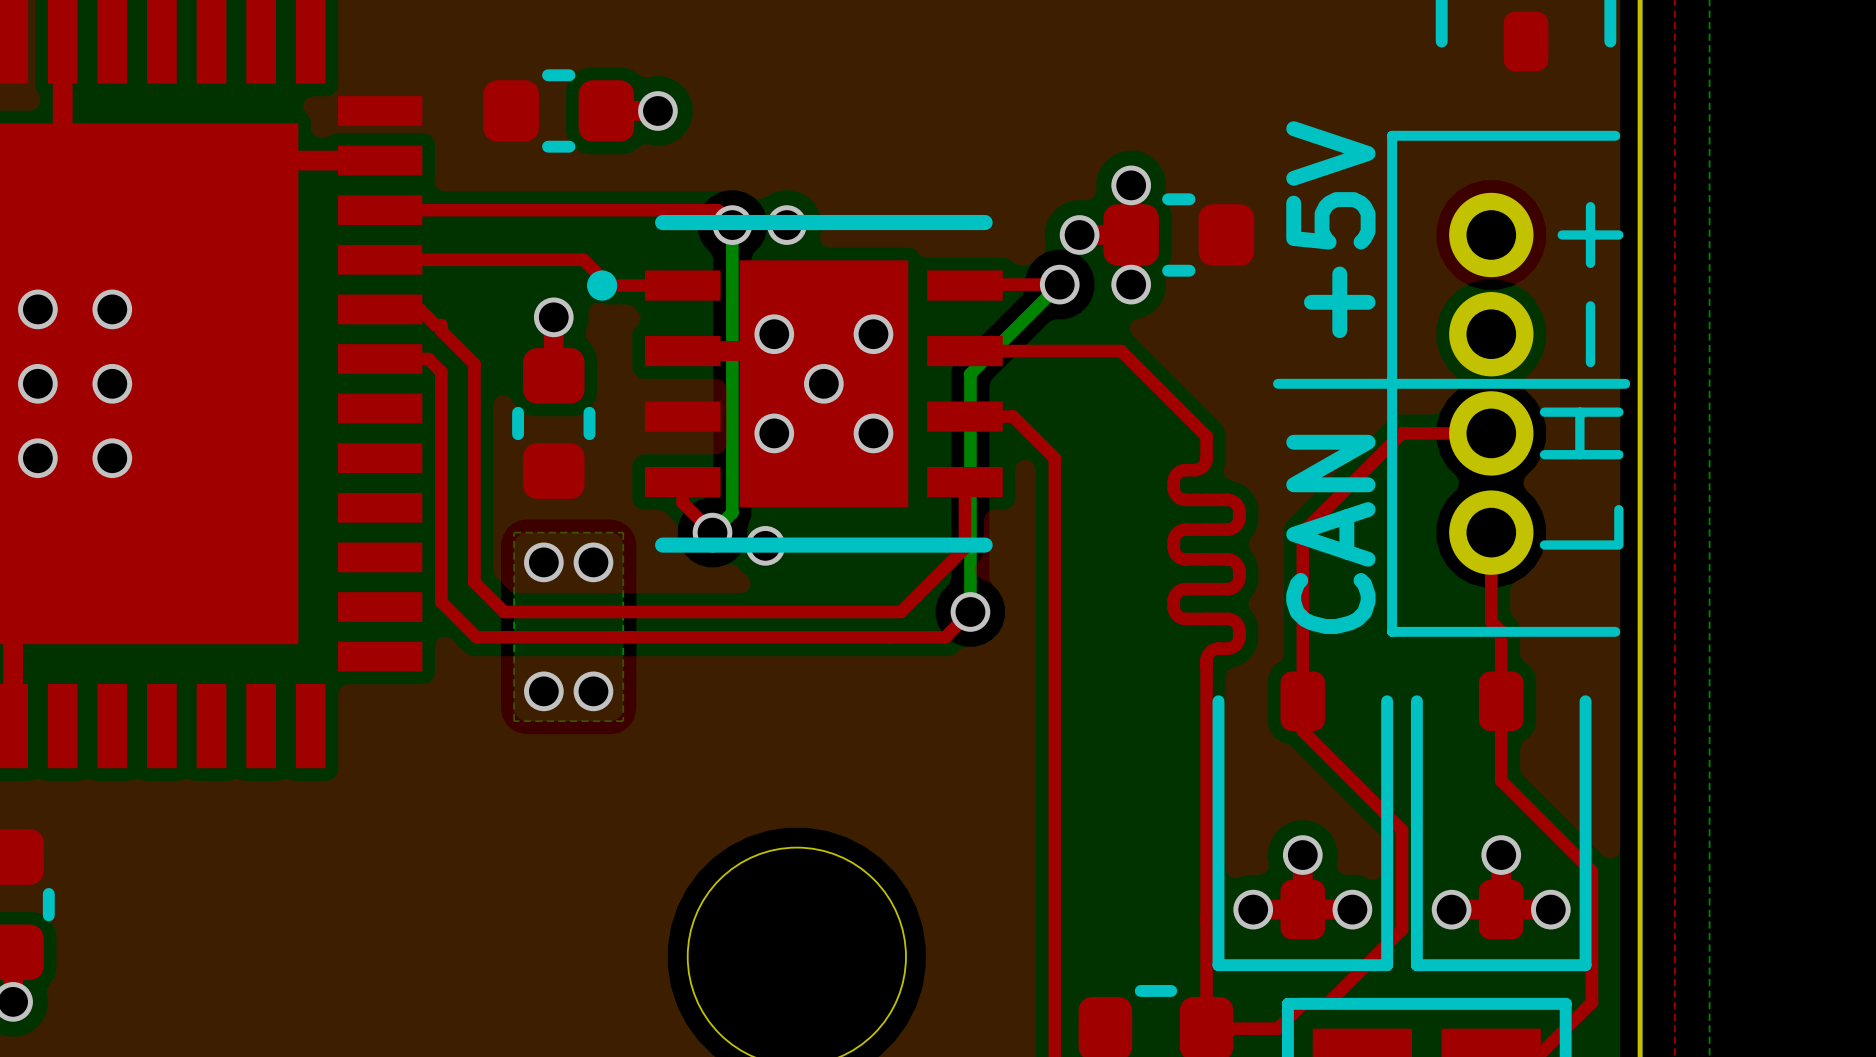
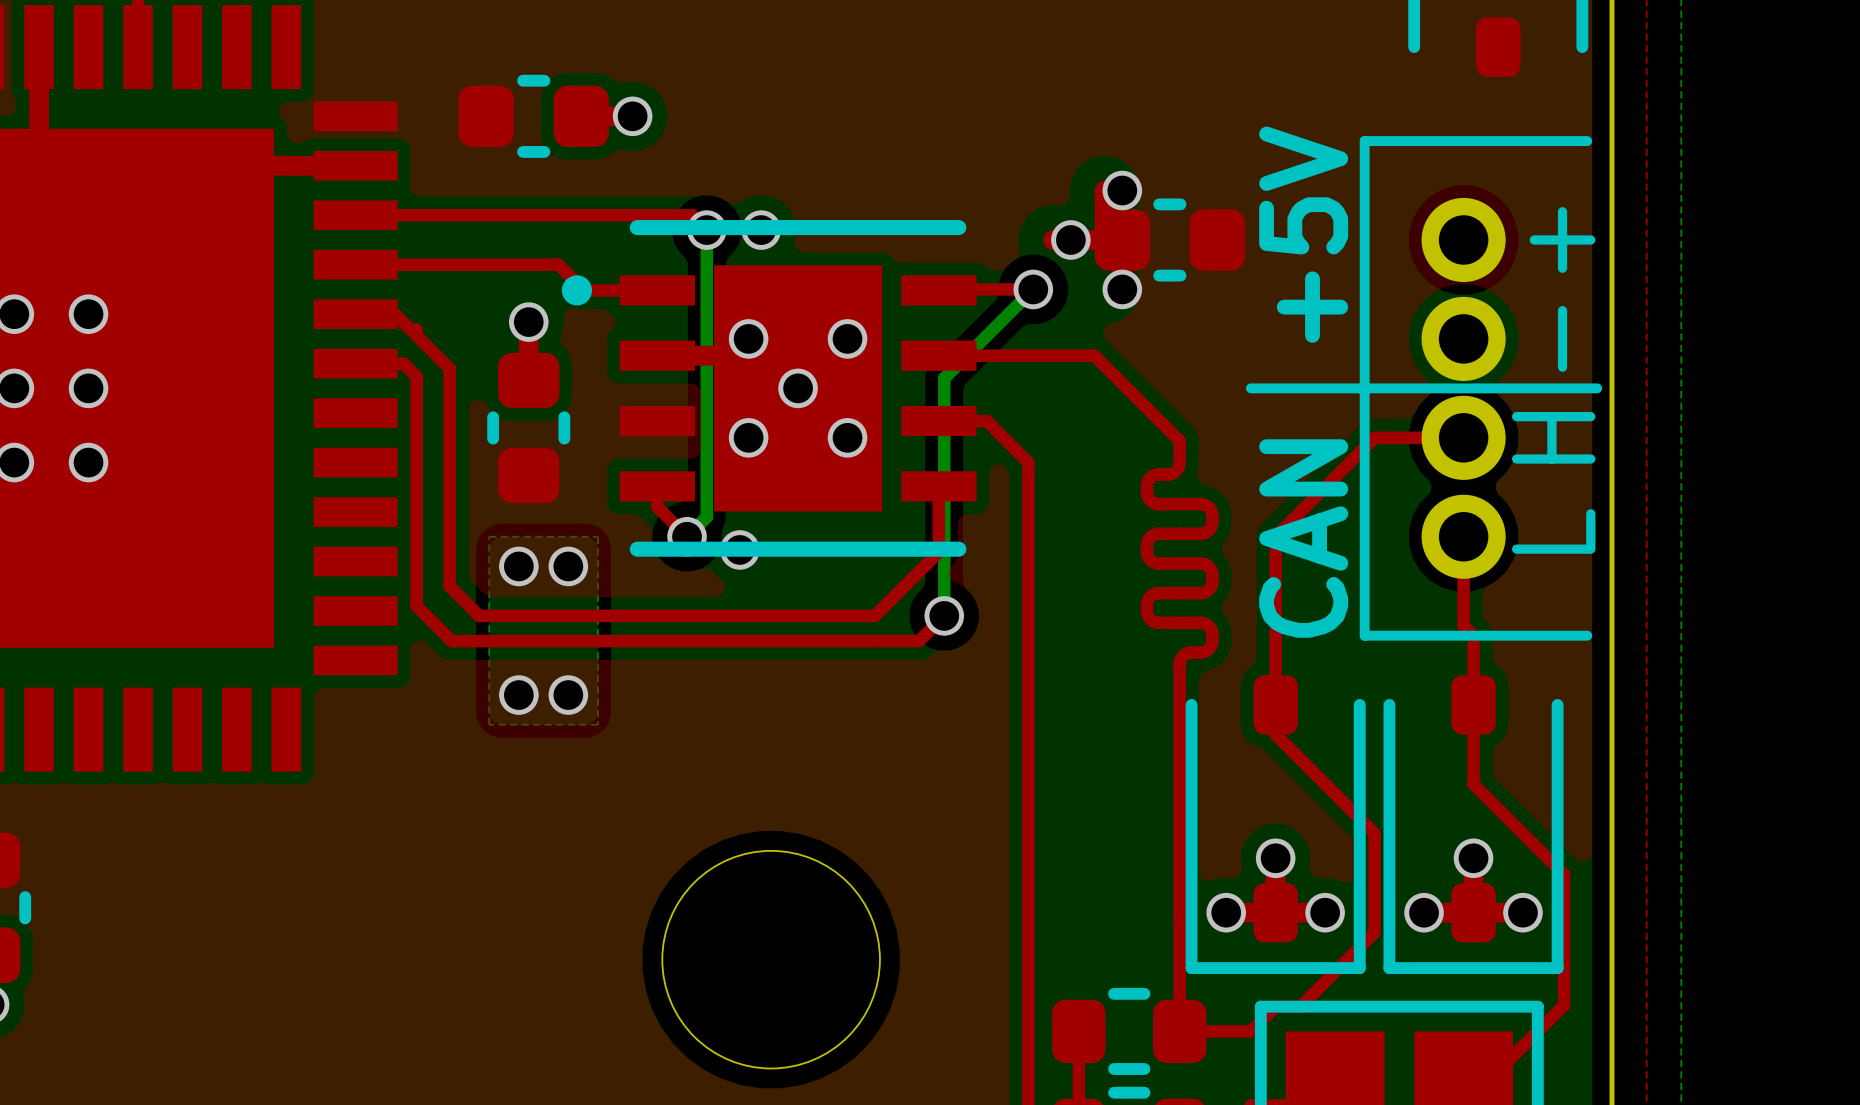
via position: (1131, 185) -> (1122, 190)
via position: (1079, 234) -> (1070, 239)
part position: (1178, 234) -> (1169, 239)
via position: (1131, 284) -> (1122, 289)

